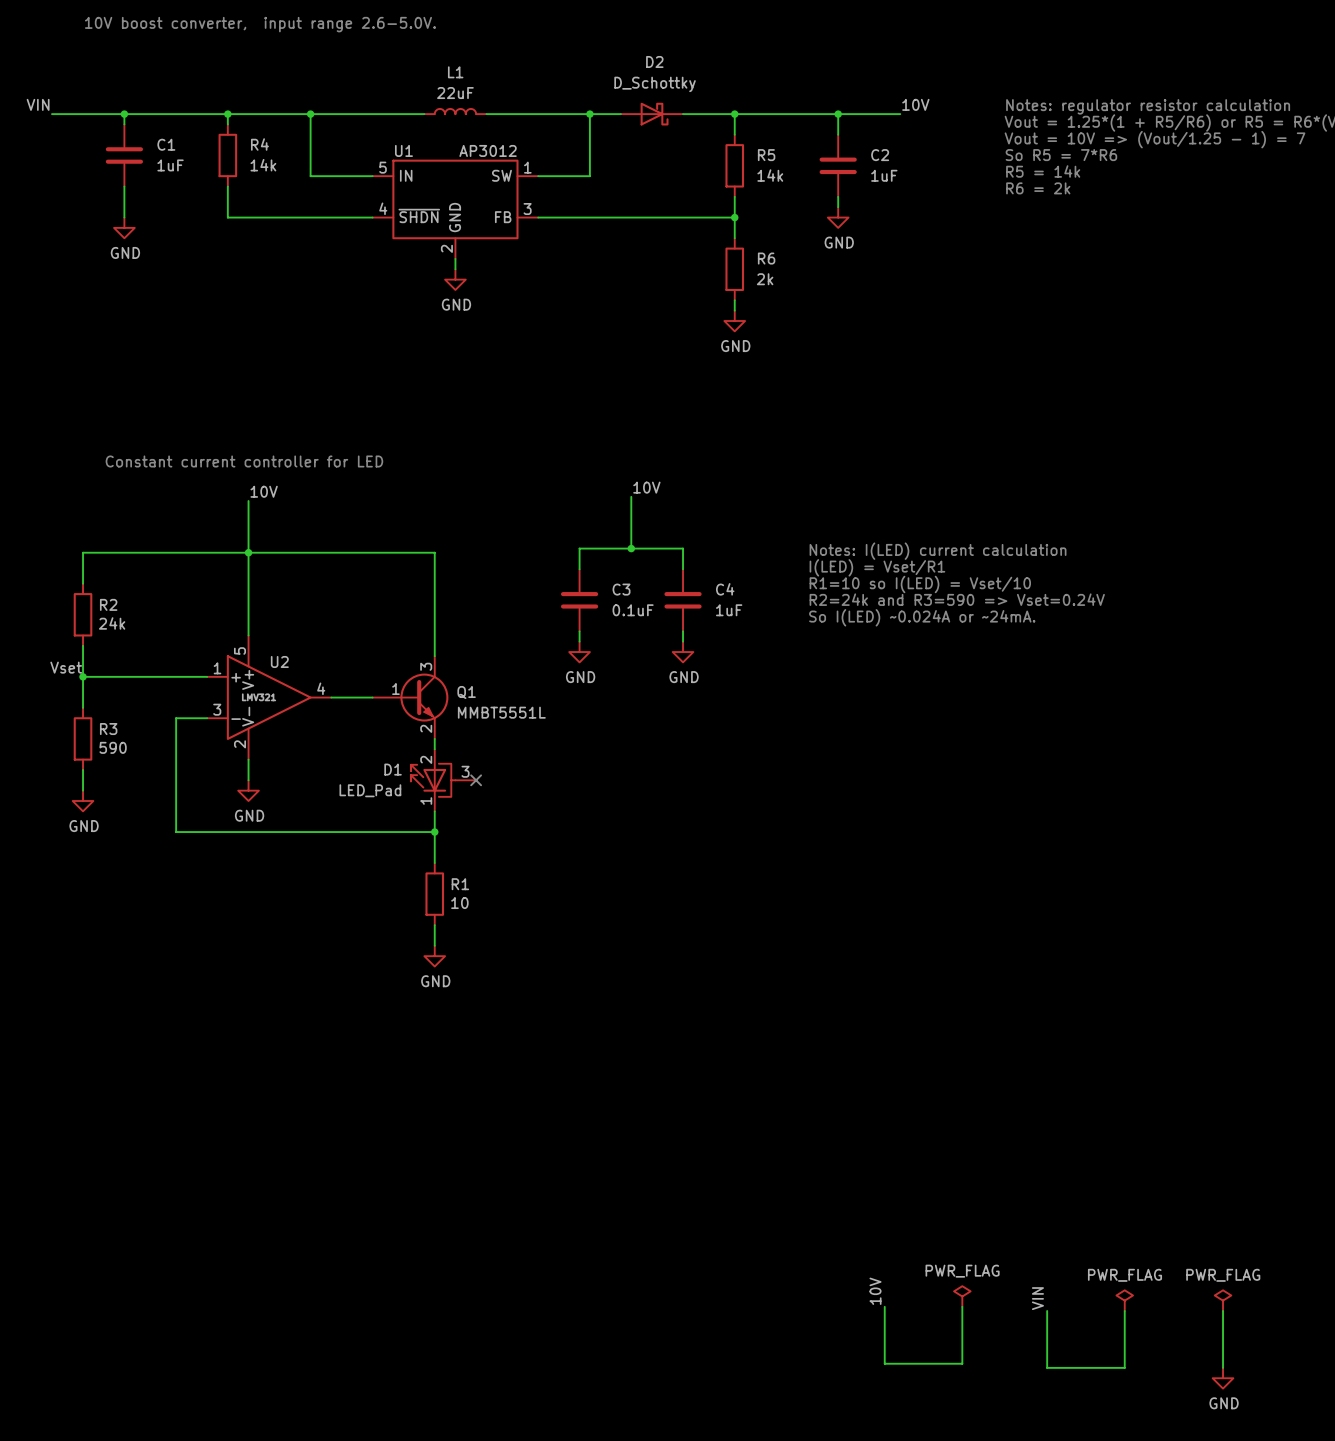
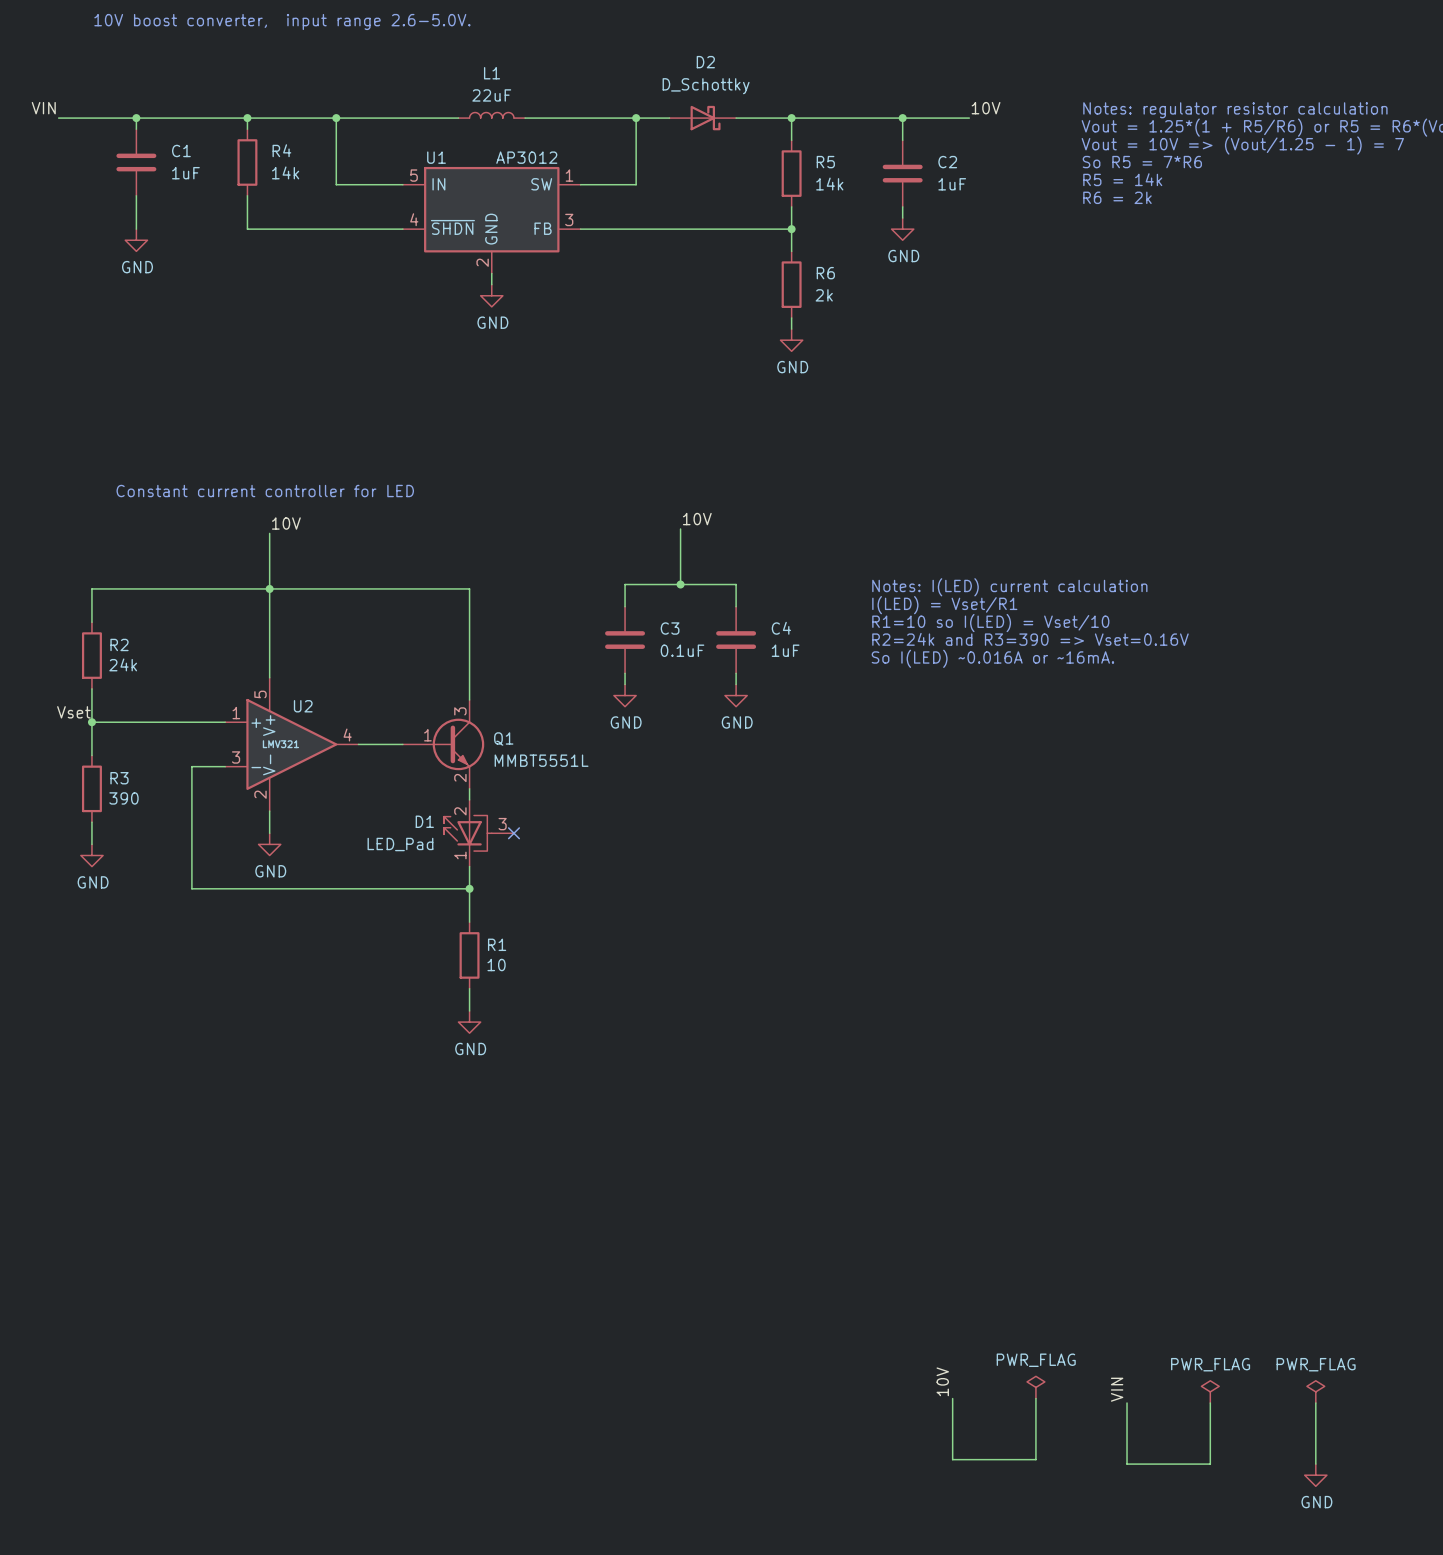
text: R2=24k and R3=590 => Vset=0.24V (957, 599) -> R2=24k and R3=390 => Vset=0.16V (1030, 639)
text: So I(LED) ~0.024A or ~24mA. (922, 617) -> So I(LED) ~0.016A or ~16mA. (992, 658)
R3 value: 590 (113, 747) -> 390 (123, 798)

